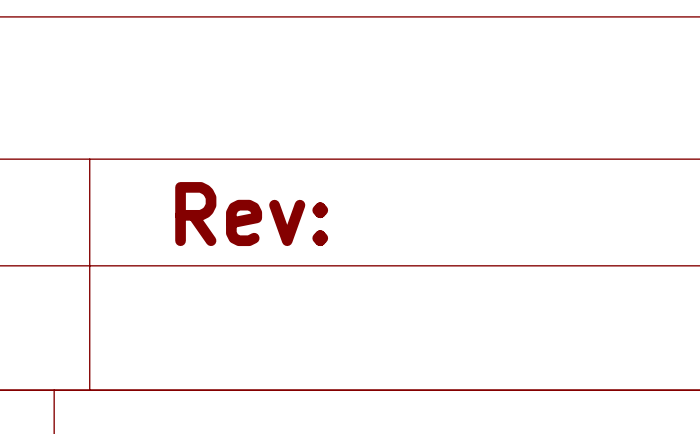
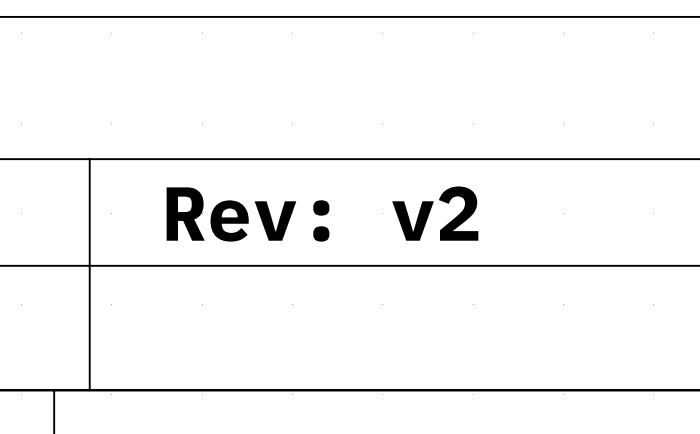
title block: Rev: (251, 214) -> Rev: v2 (322, 214)

